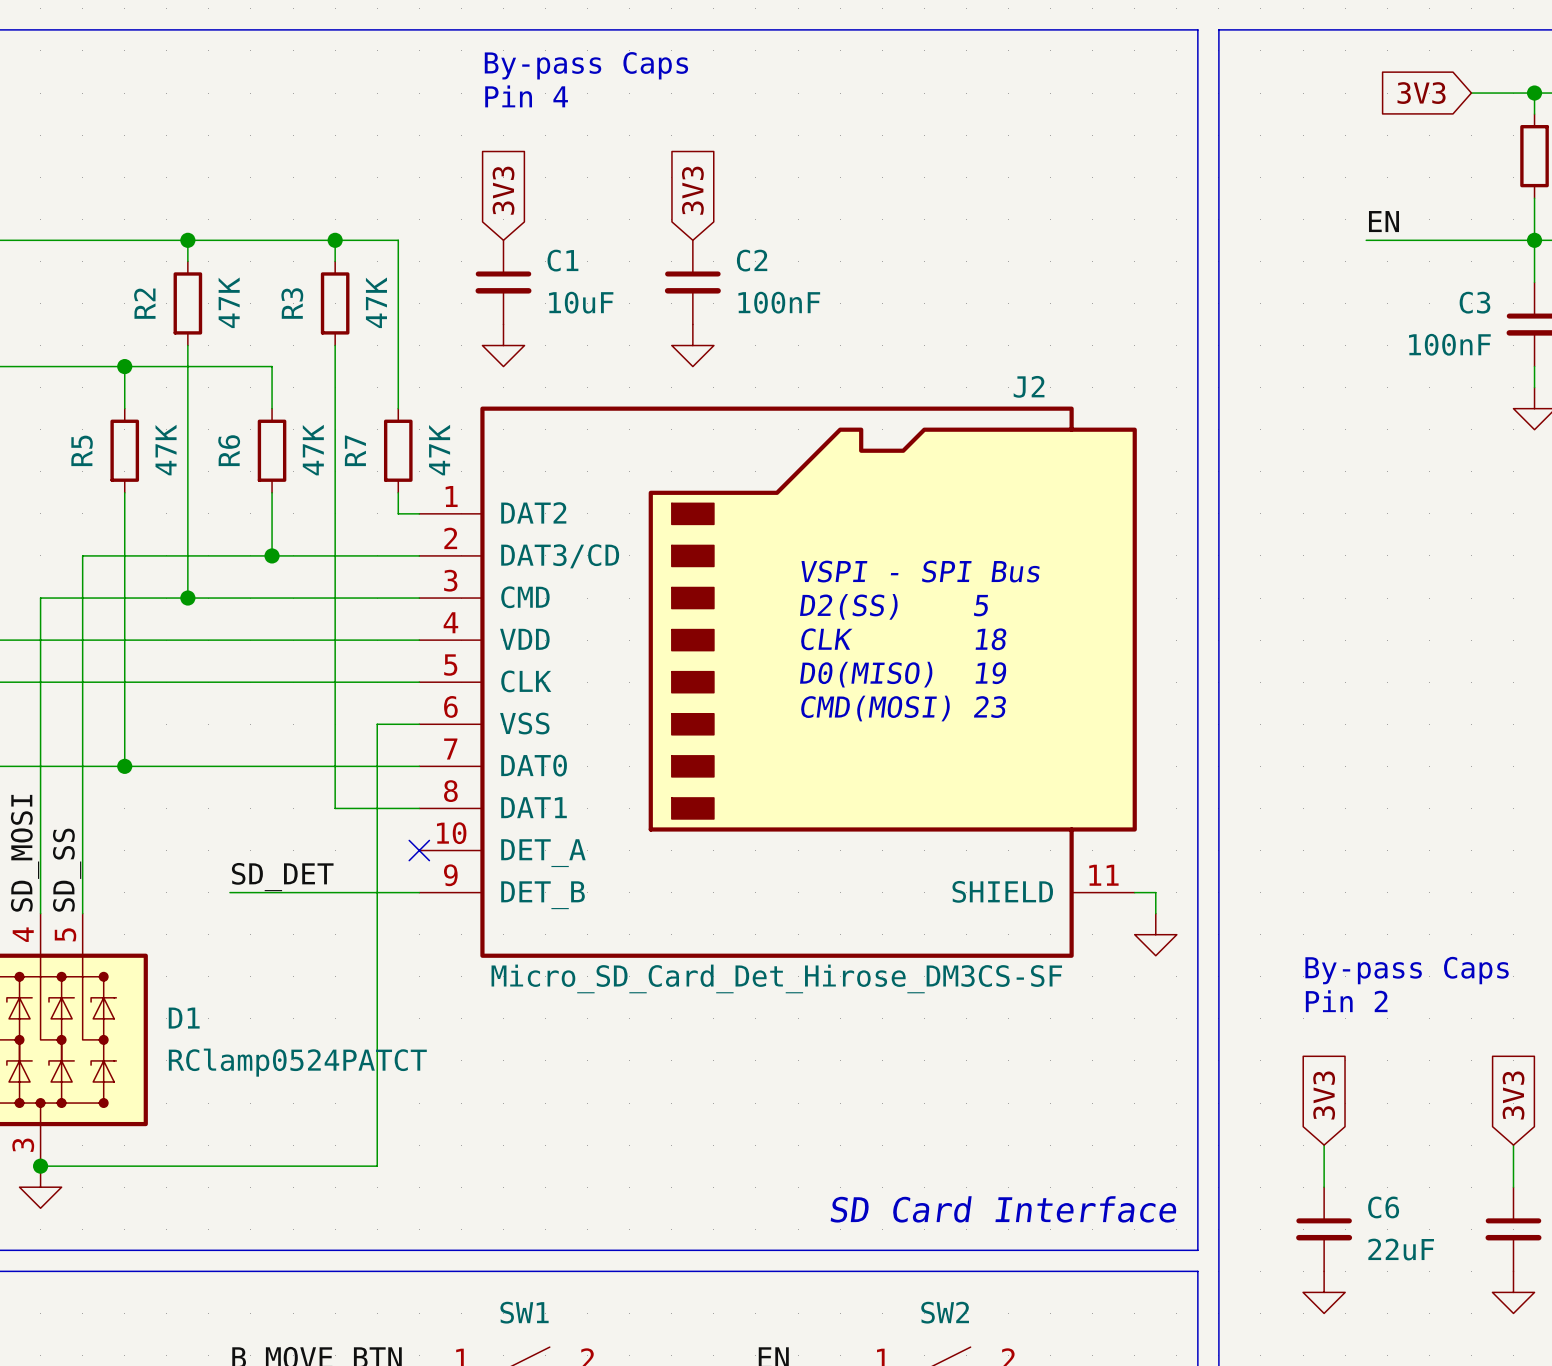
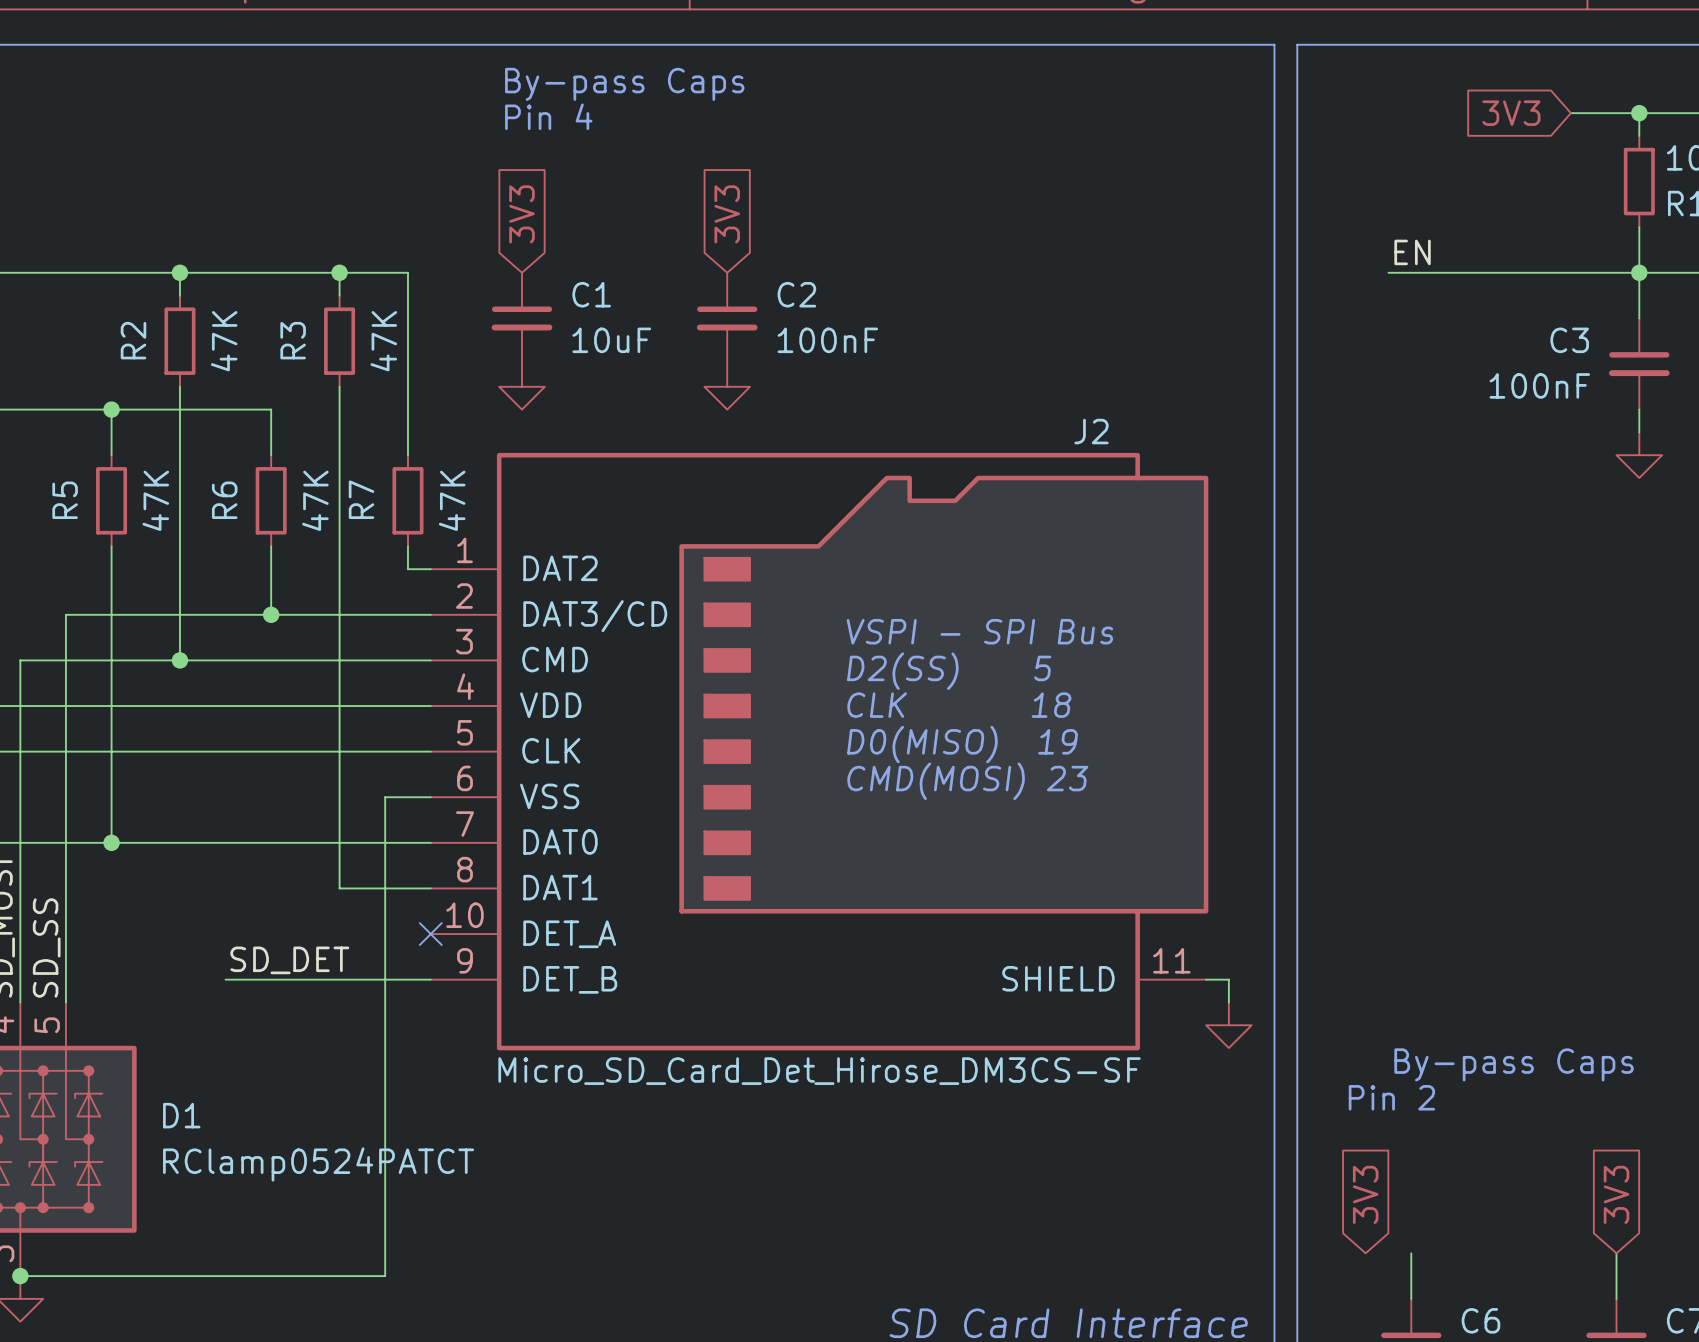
label position: EN (1383, 221) -> EN (1412, 252)
wire: none -> (1388, 272) (1456, 272)
text position: Pin 2 (1346, 1001) -> Pin 2 (1391, 1097)
global label position: 3V3 (1324, 1095) -> 3V3 (1365, 1194)

